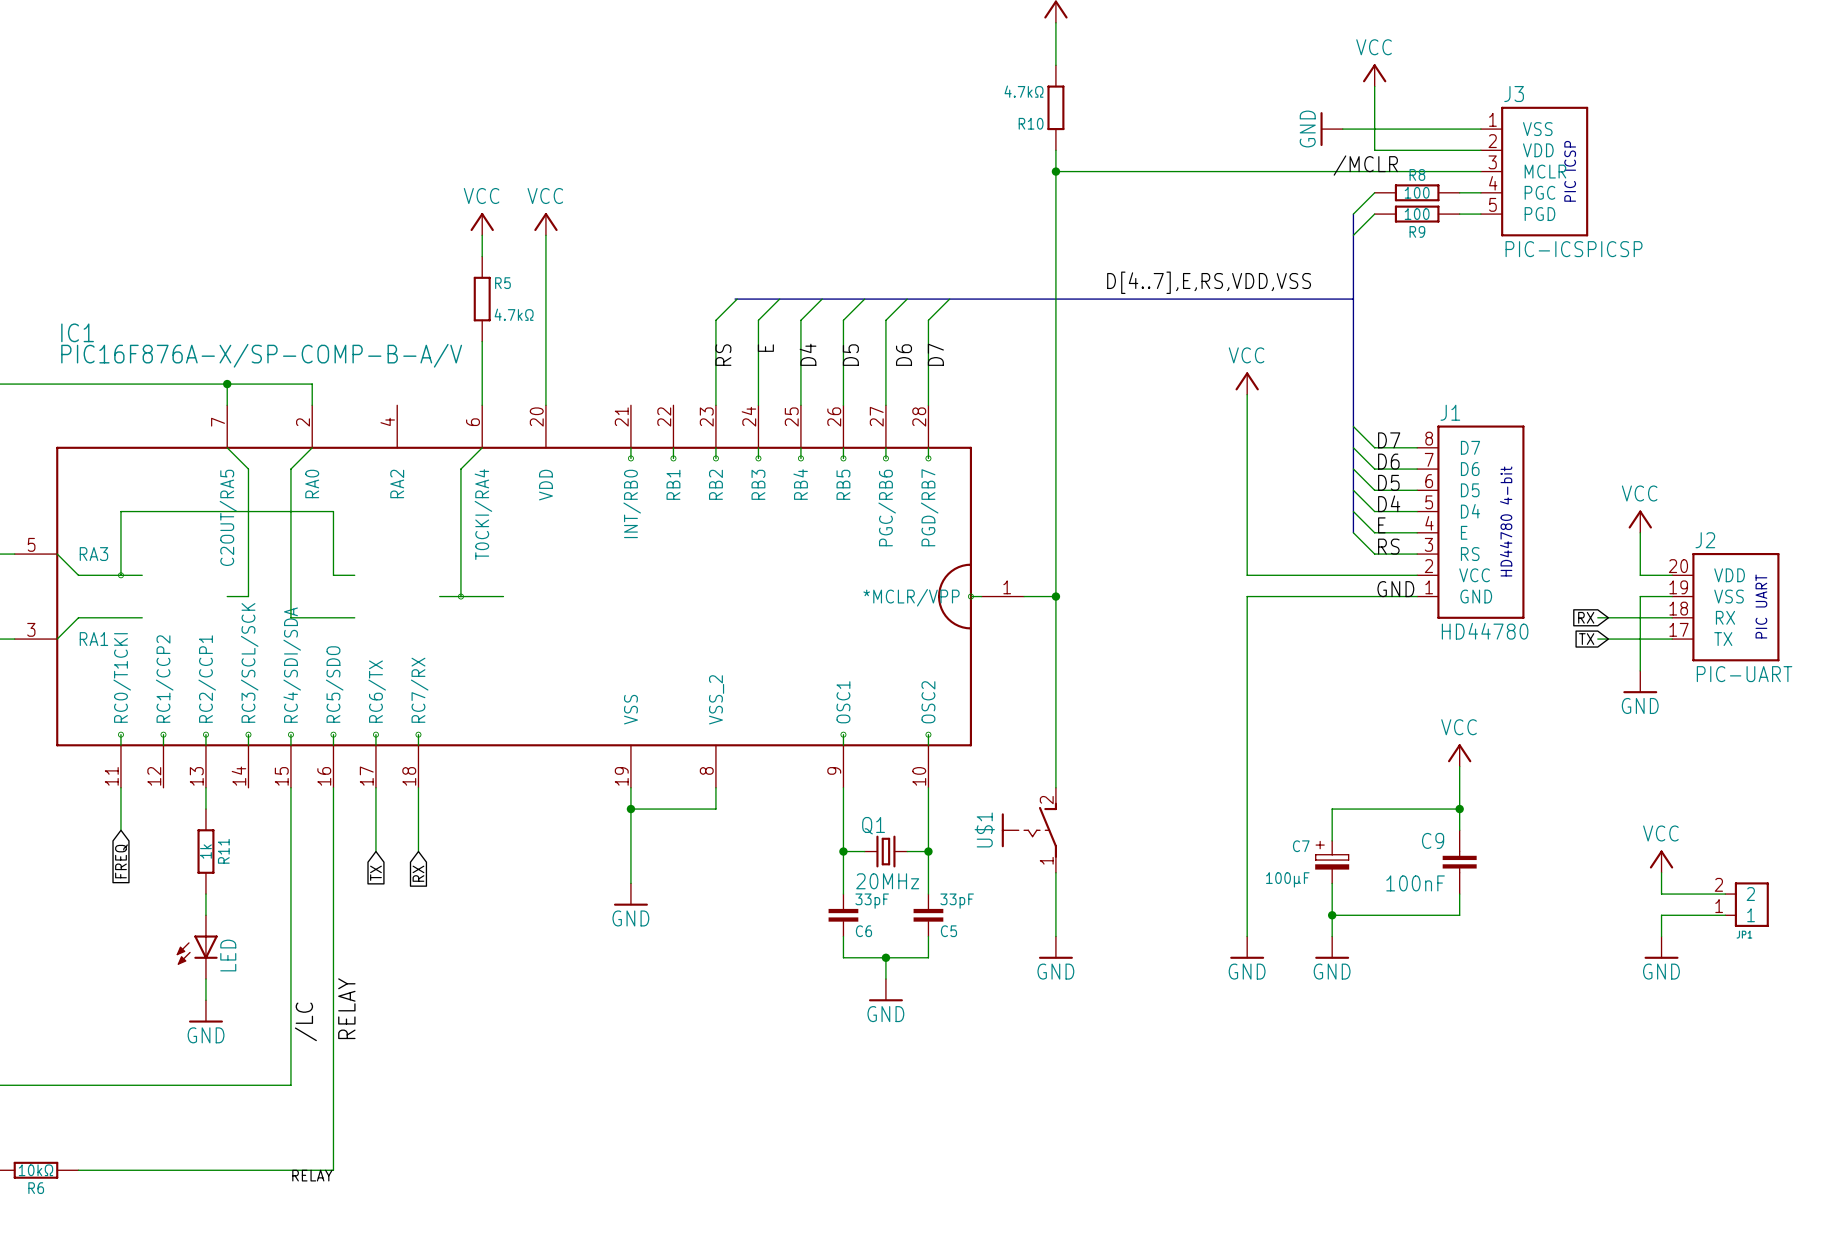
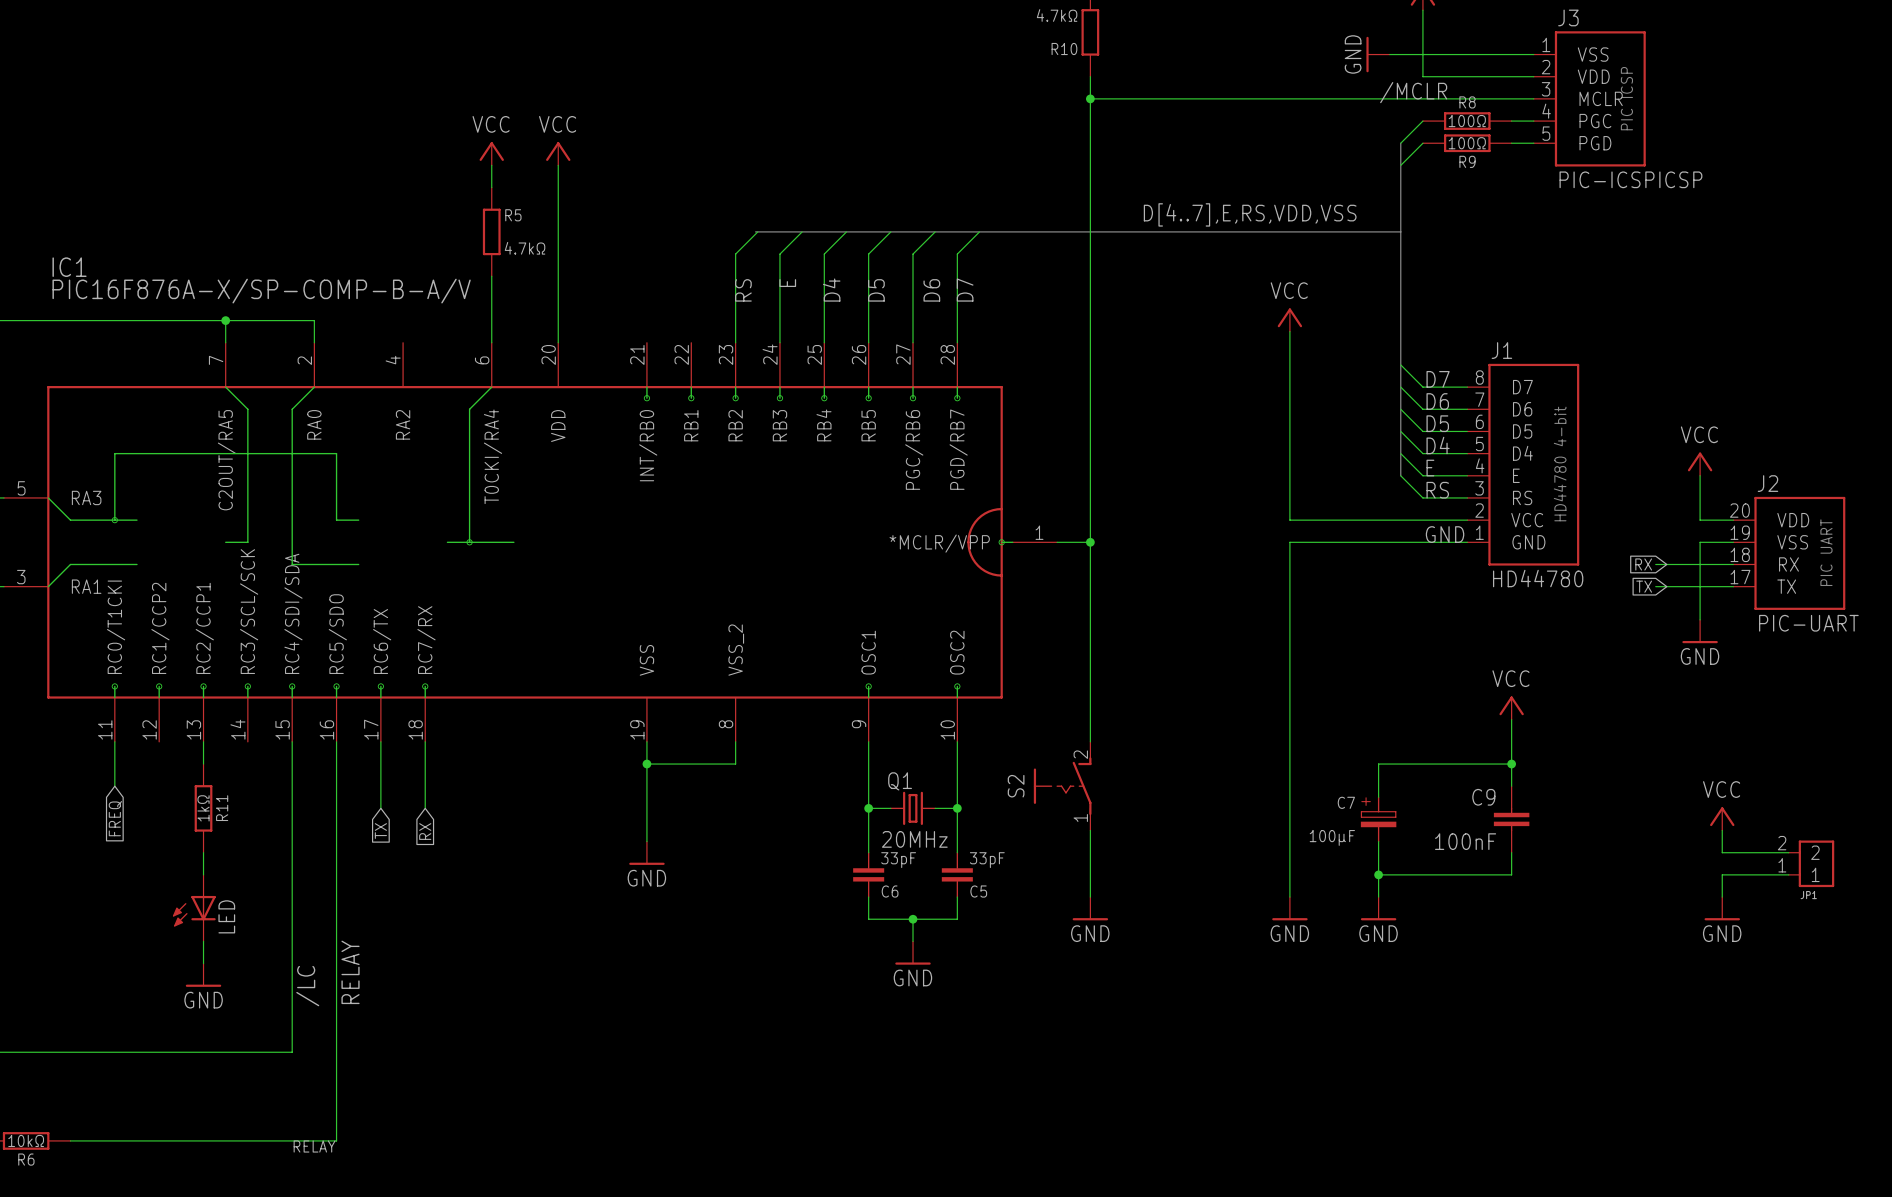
R8 value: 100 (1417, 192) -> 100Ω (1467, 121)
R9 value: 100 (1417, 214) -> 100Ω (1467, 143)
U$1 name: U$1 (984, 829) -> S2 (1016, 786)
R11 value: 1k (205, 851) -> 1kΩ (203, 808)

